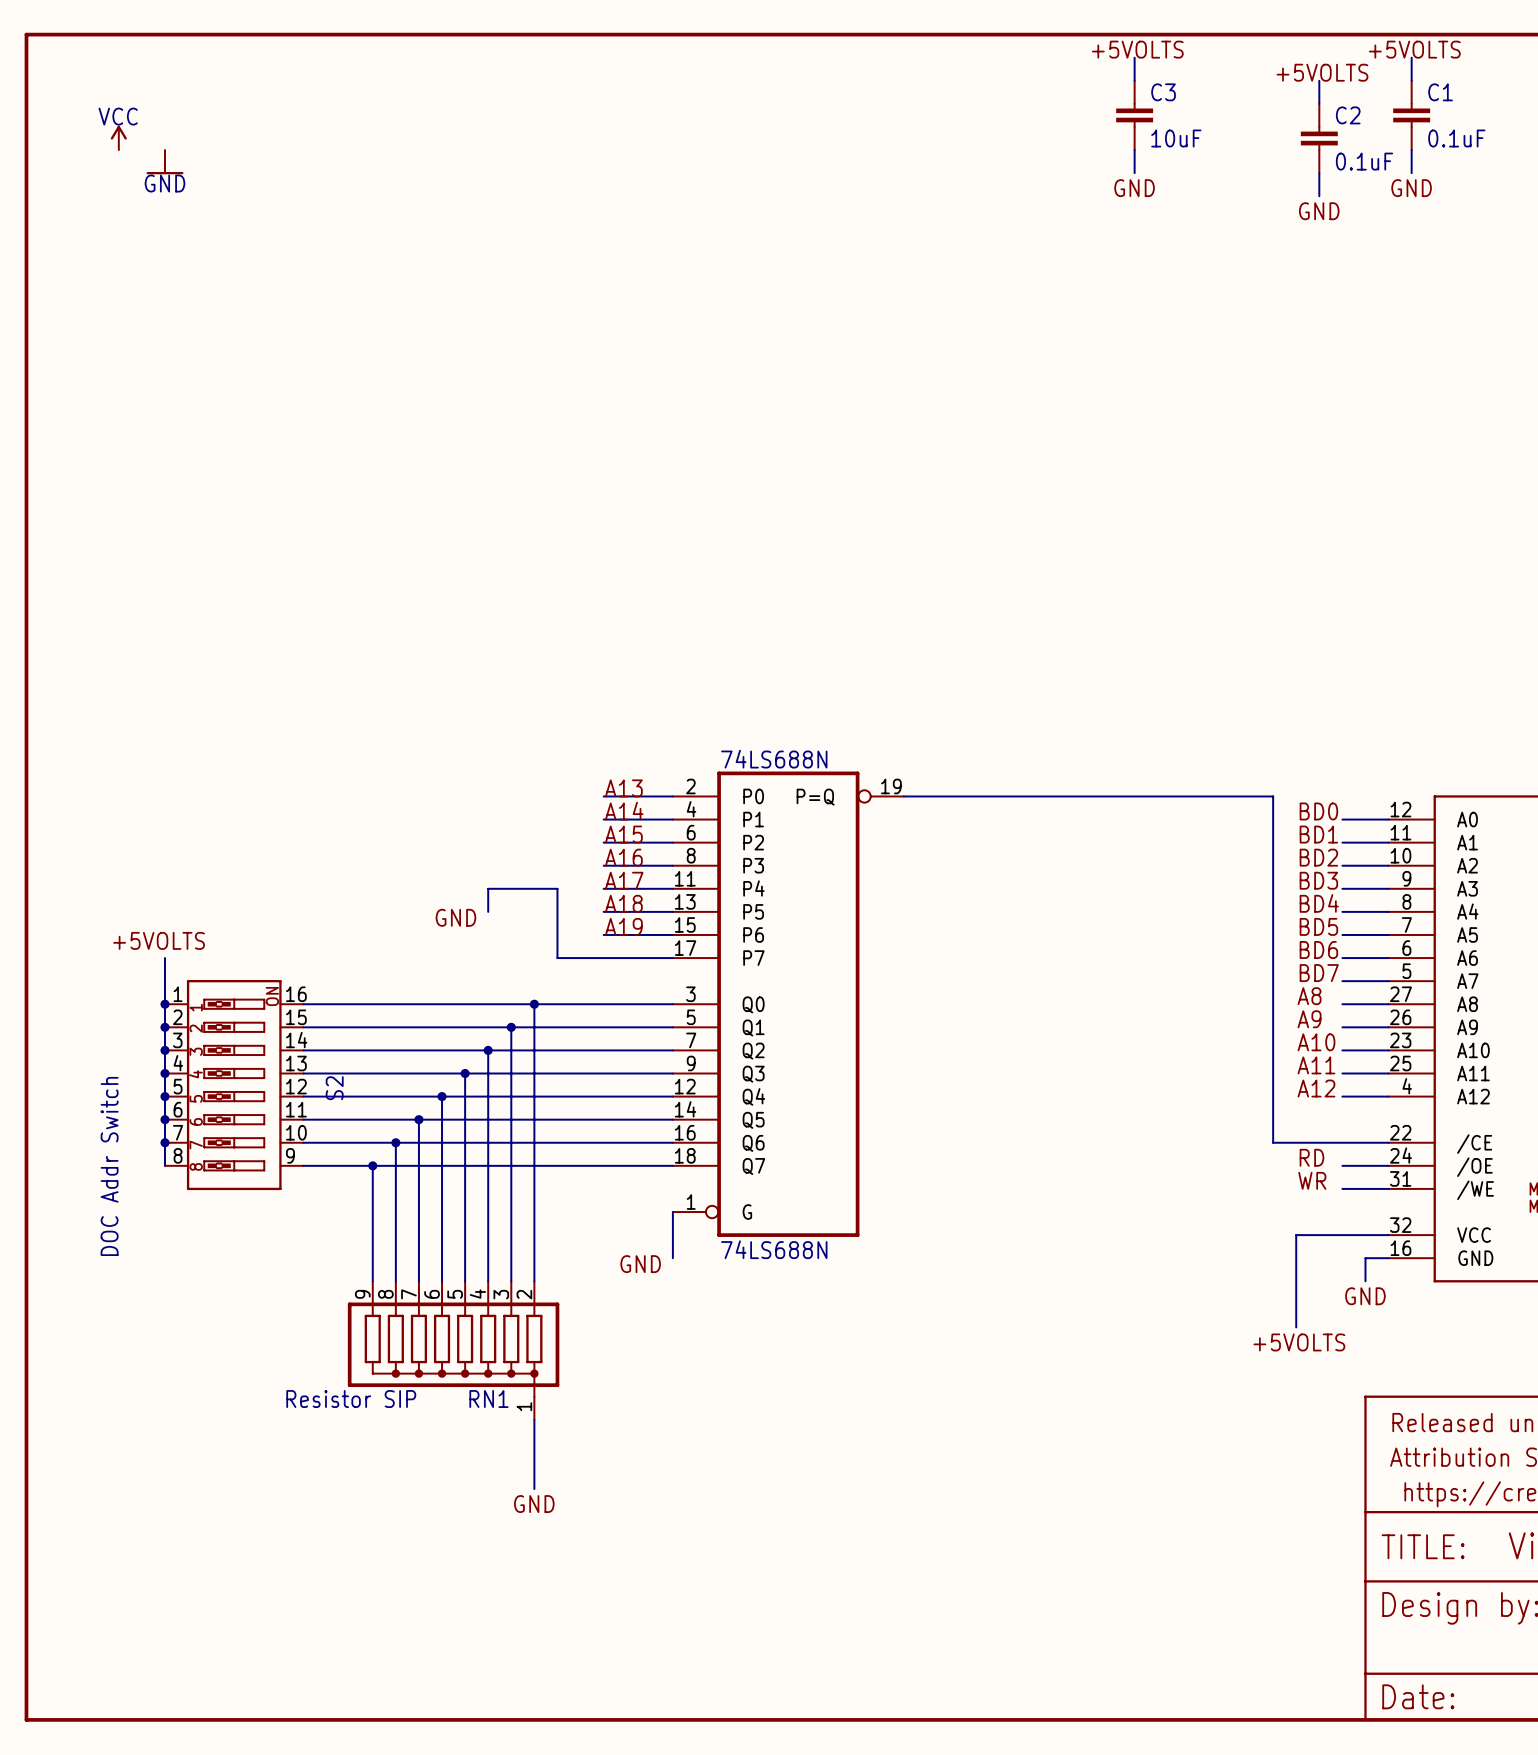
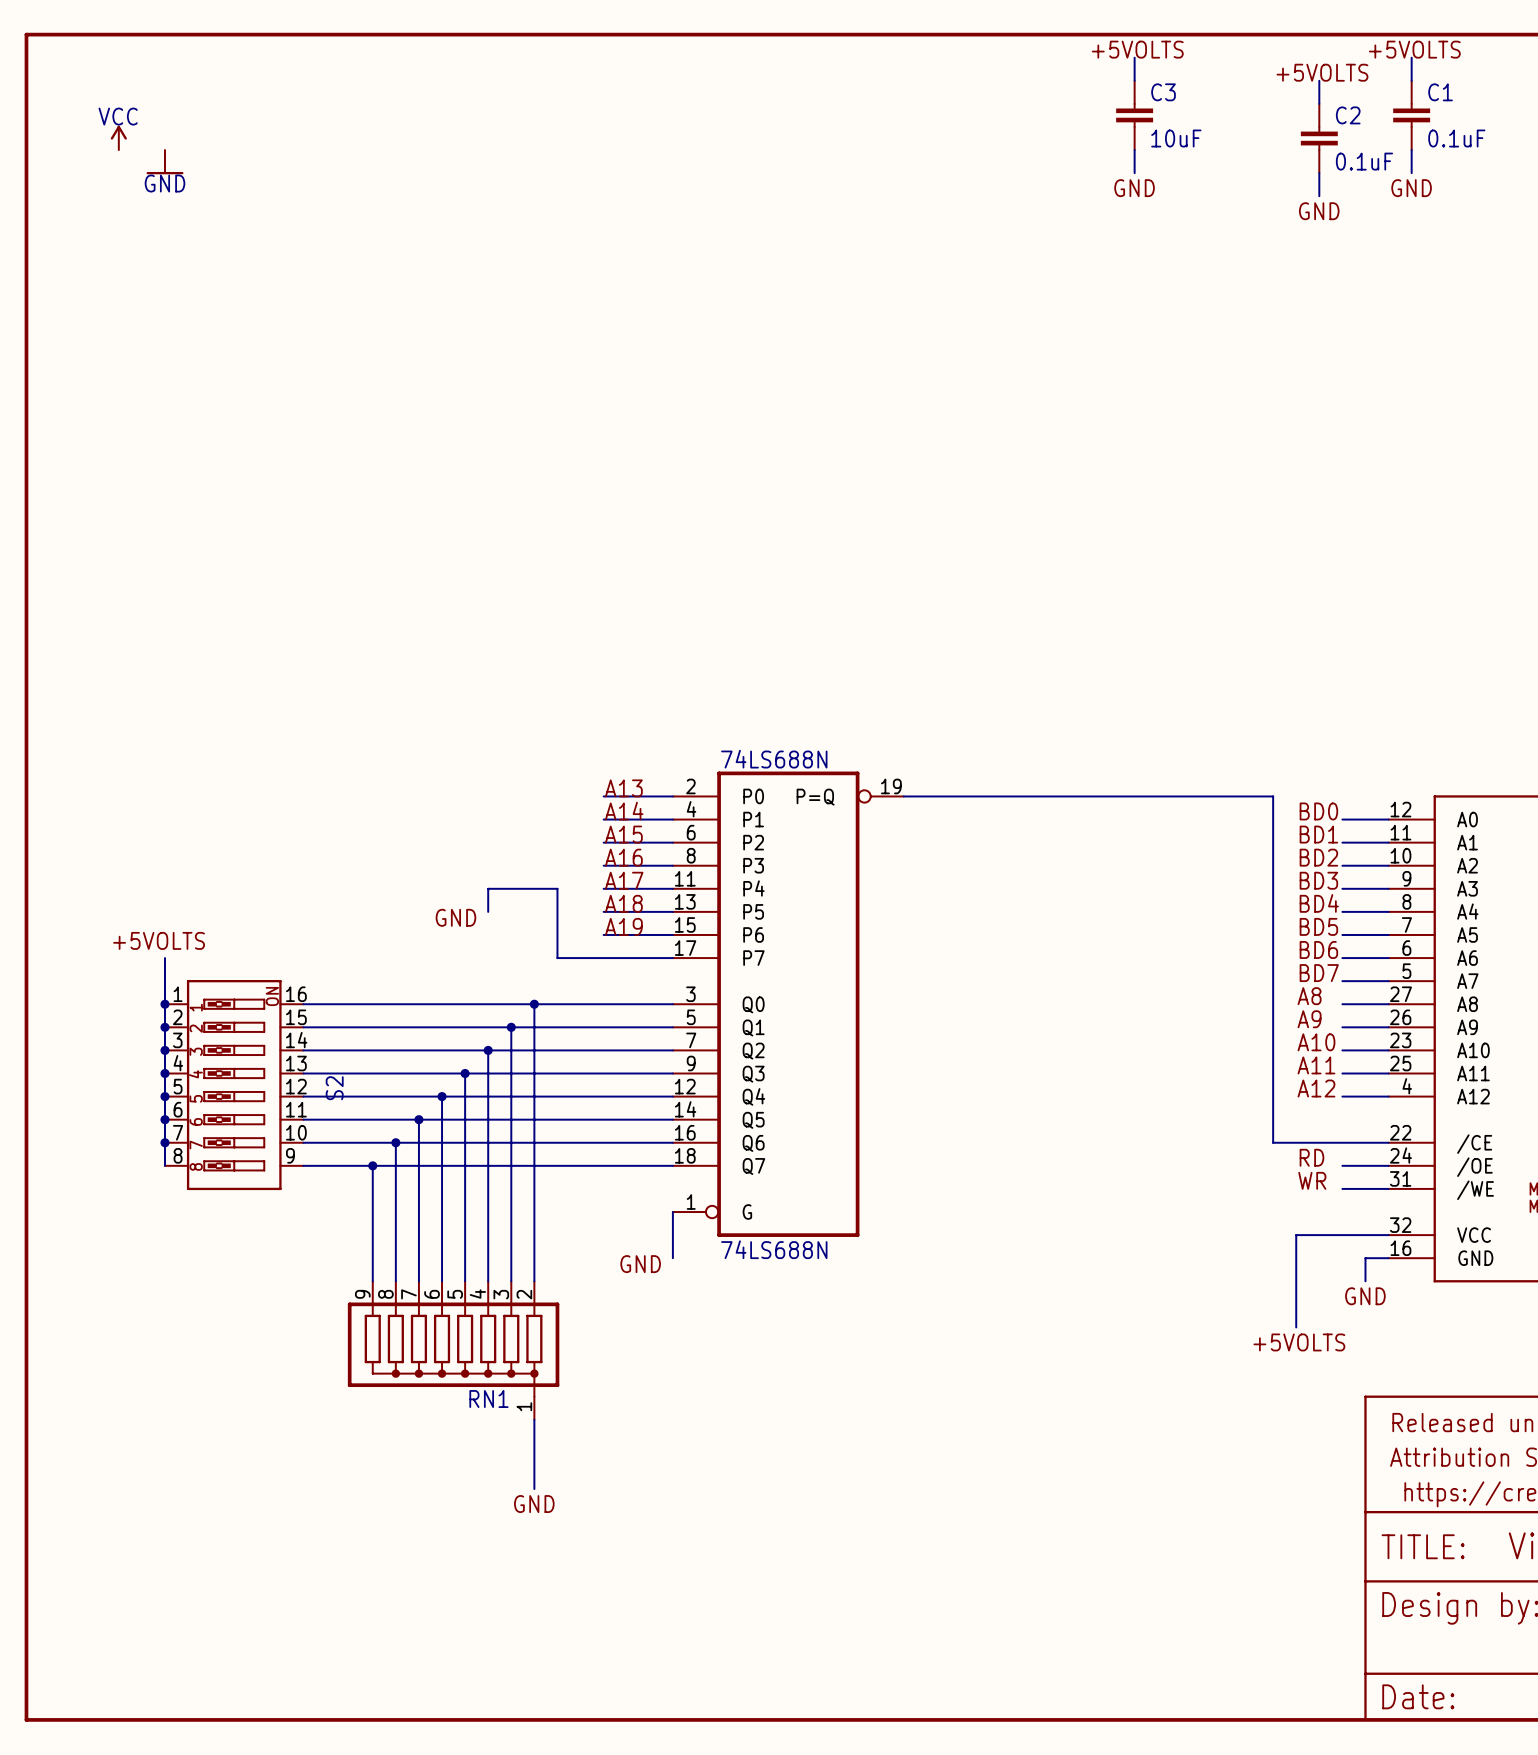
S2 value: DOC Addr Switch (109, 1166) -> none
RN1 value: Resistor SIP (351, 1399) -> none

